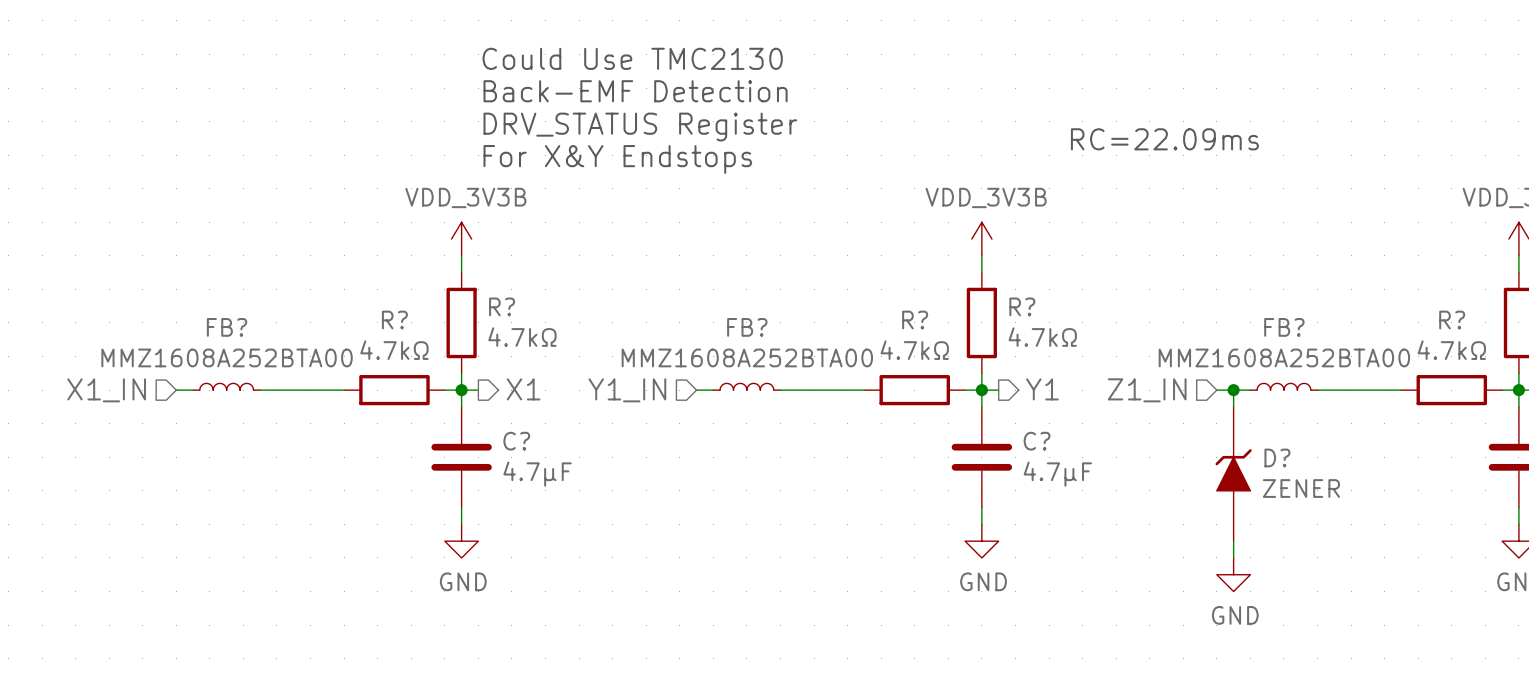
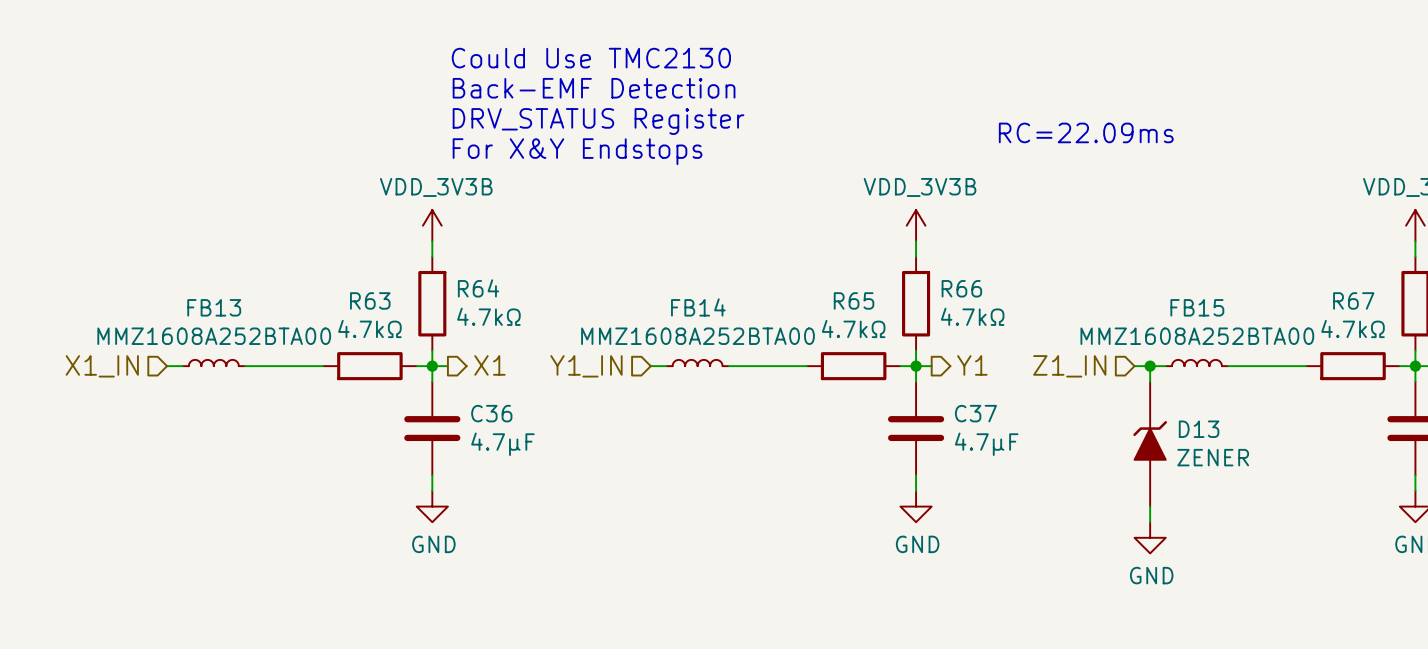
R? name: R? (502, 306) -> R64 (478, 288)
R? name: R? (1022, 306) -> R66 (961, 288)
R? name: R? (394, 320) -> R63 (370, 300)
R? name: R? (915, 320) -> R65 (854, 300)
R? name: R? (1452, 320) -> R67 (1353, 300)
FB? name: FB? (227, 327) -> FB13 (214, 307)
FB? name: FB? (747, 327) -> FB14 (698, 307)
FB? name: FB? (1284, 327) -> FB15 (1197, 307)
C? name: C? (516, 441) -> C36 (491, 413)
C? name: C? (1037, 441) -> C37 (975, 413)
D? name: D? (1277, 457) -> D13 (1199, 429)

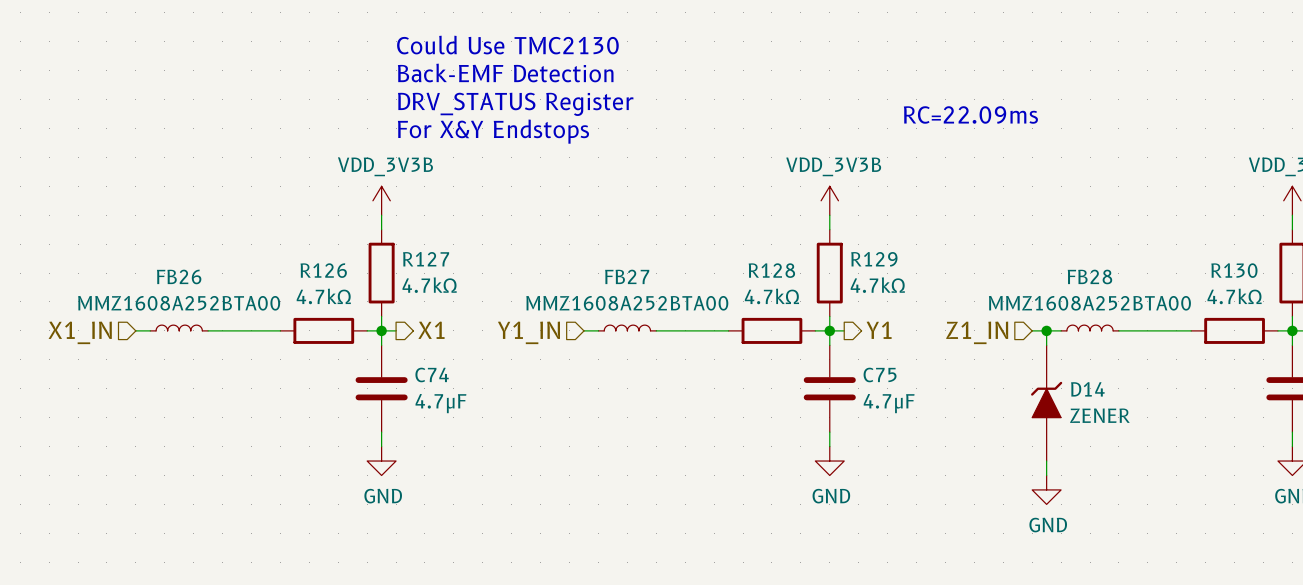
R64 name: R64 (478, 288) -> R127 (426, 259)
R66 name: R66 (961, 288) -> R129 (874, 259)
R63 name: R63 (370, 300) -> R126 (323, 270)
R65 name: R65 (854, 300) -> R128 (771, 270)
R67 name: R67 (1353, 300) -> R130 (1234, 270)
FB13 name: FB13 (214, 307) -> FB26 (179, 276)
FB14 name: FB14 (698, 307) -> FB27 (627, 276)
FB15 name: FB15 (1197, 307) -> FB28 (1089, 276)
C36 name: C36 (491, 413) -> C74 (432, 374)
C37 name: C37 (975, 413) -> C75 (880, 374)
D13 name: D13 (1199, 429) -> D14 (1087, 389)

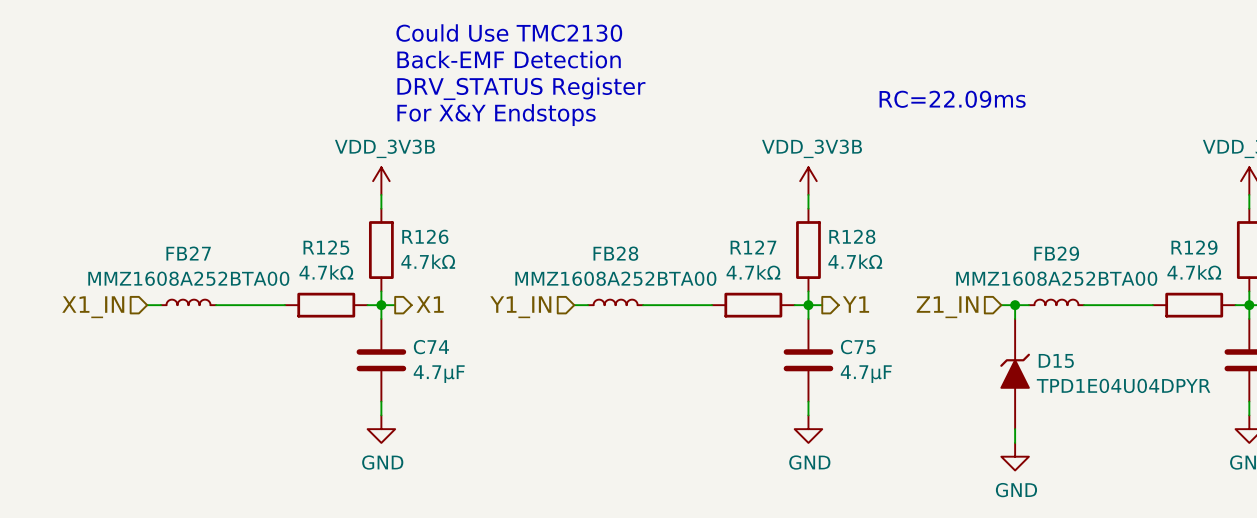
R127 name: R127 (426, 259) -> R126 (425, 236)
R129 name: R129 (874, 259) -> R128 (852, 236)
R126 name: R126 (323, 270) -> R125 (326, 247)
R128 name: R128 (771, 270) -> R127 (753, 247)
R130 name: R130 (1234, 270) -> R129 (1194, 247)
FB26 name: FB26 (179, 276) -> FB27 (188, 253)
FB27 name: FB27 (627, 276) -> FB28 (615, 253)
FB28 name: FB28 (1089, 276) -> FB29 (1056, 253)
D14 name: D14 (1087, 389) -> D15 (1056, 360)
D14 value: ZENER (1099, 415) -> TPD1E04U04DPYR (1123, 385)

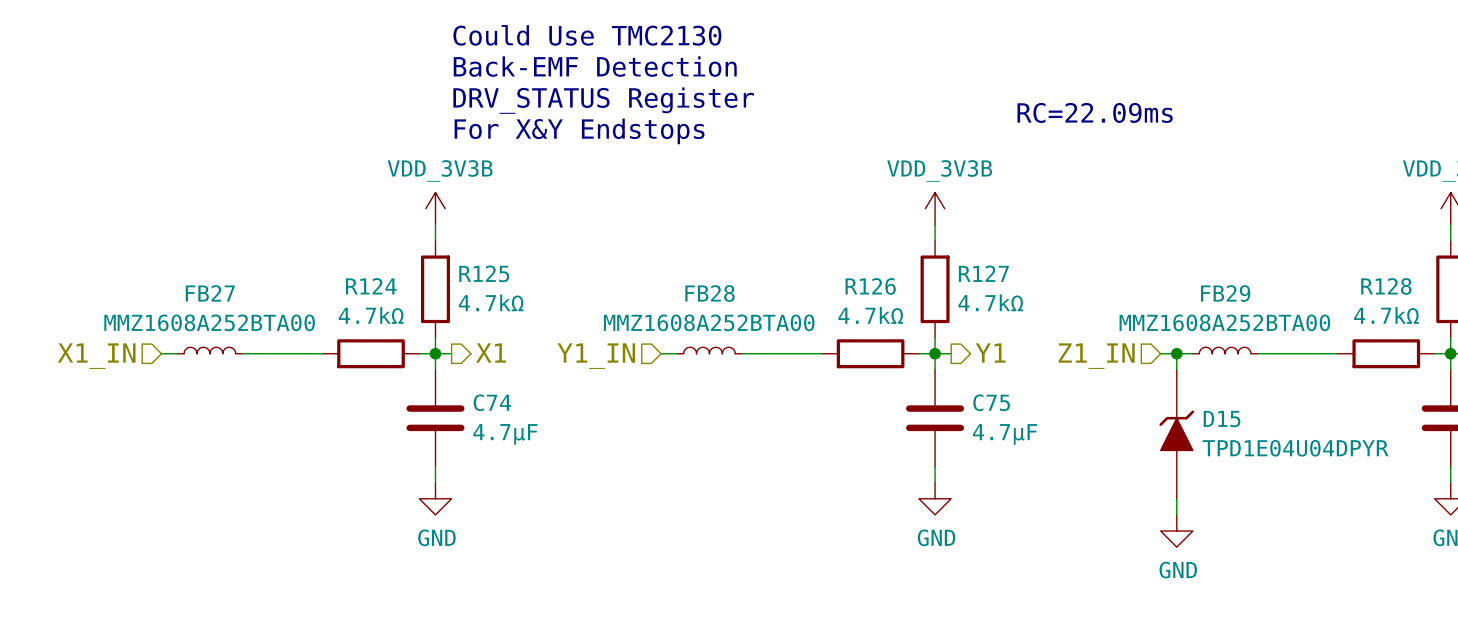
R126 name: R126 (425, 236) -> R125 (484, 273)
R128 name: R128 (852, 236) -> R127 (983, 273)
R125 name: R125 (326, 247) -> R124 (371, 286)
R127 name: R127 (753, 247) -> R126 (870, 286)
R129 name: R129 (1194, 247) -> R128 (1386, 286)

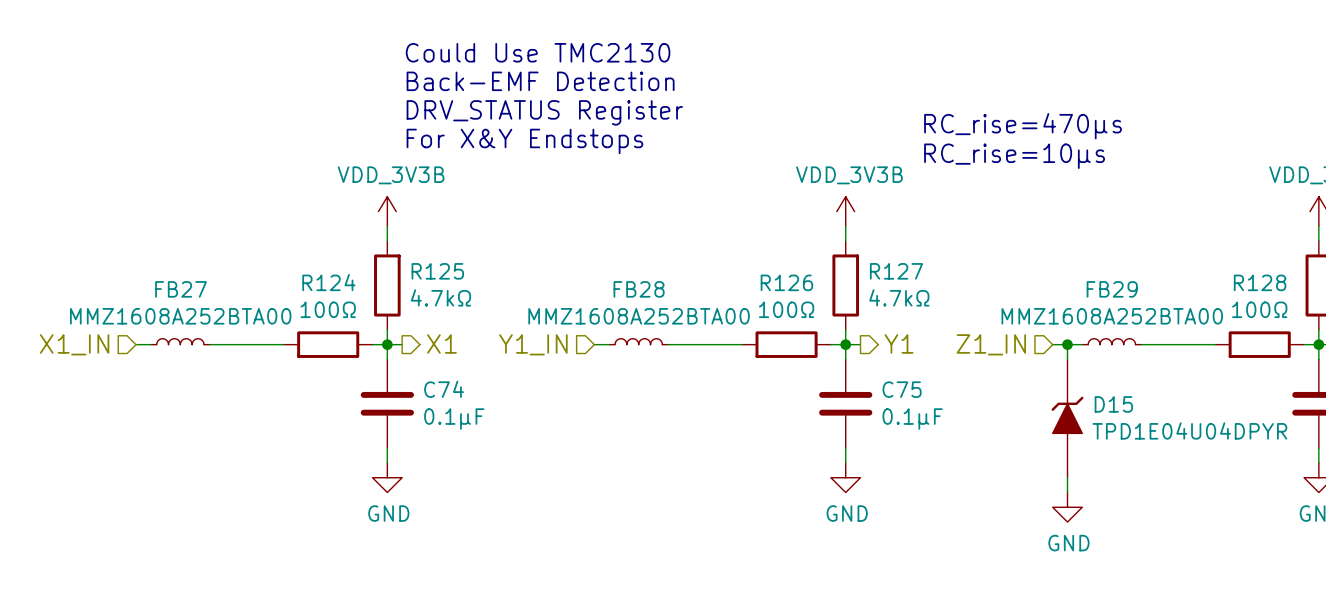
text: RC=22.09ms (1095, 112) -> RC_rise=470μs (1023, 126)
text: none -> RC_rise=10μs (1014, 156)
R124 value: 4.7kΩ (371, 315) -> 100Ω (328, 309)
R126 value: 4.7kΩ (870, 315) -> 100Ω (786, 309)
R128 value: 4.7kΩ (1386, 315) -> 100Ω (1259, 309)
C74 value: 4.7μF (505, 434) -> 0.1μF (454, 419)
C75 value: 4.7μF (1004, 434) -> 0.1μF (912, 419)

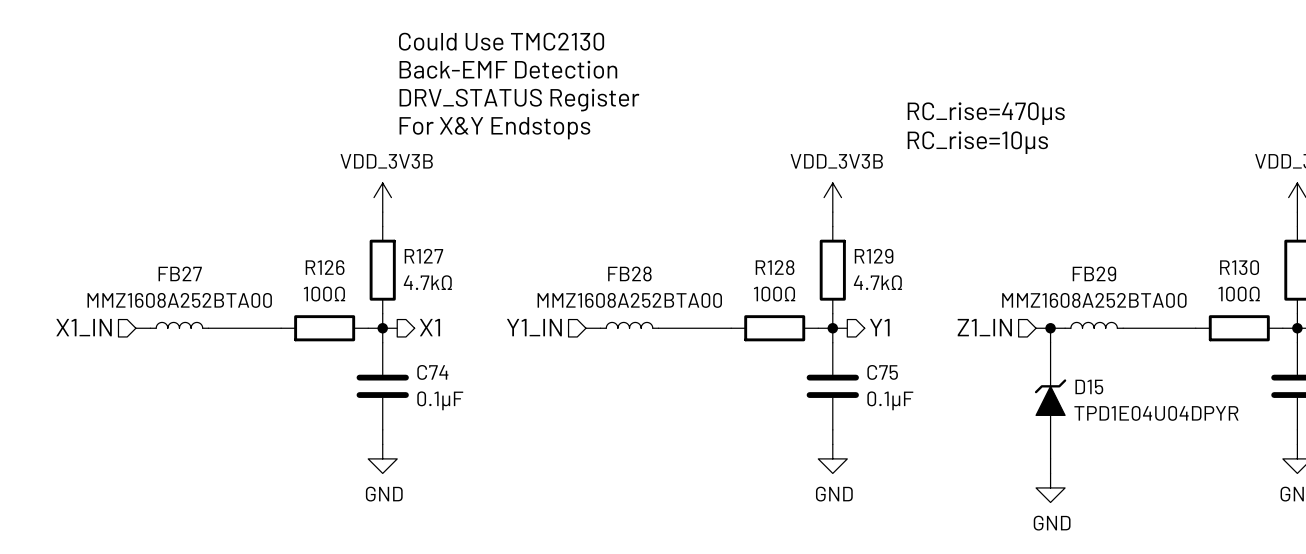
R125 name: R125 (437, 271) -> R127 (423, 256)
R127 name: R127 (896, 271) -> R129 (874, 256)
R124 name: R124 (328, 282) -> R126 (325, 267)
R126 name: R126 (786, 282) -> R128 (775, 267)
R128 name: R128 (1260, 282) -> R130 (1239, 267)

